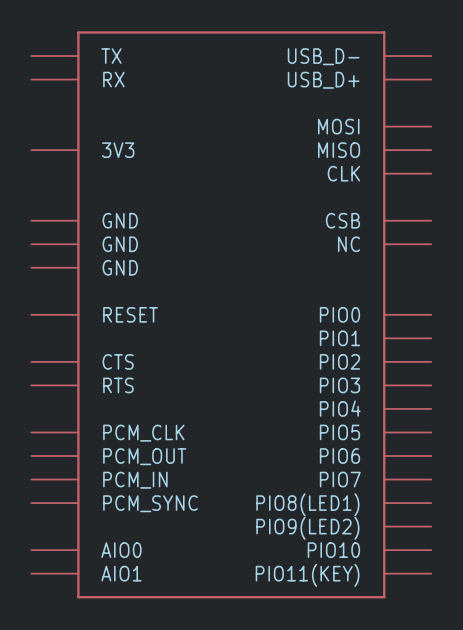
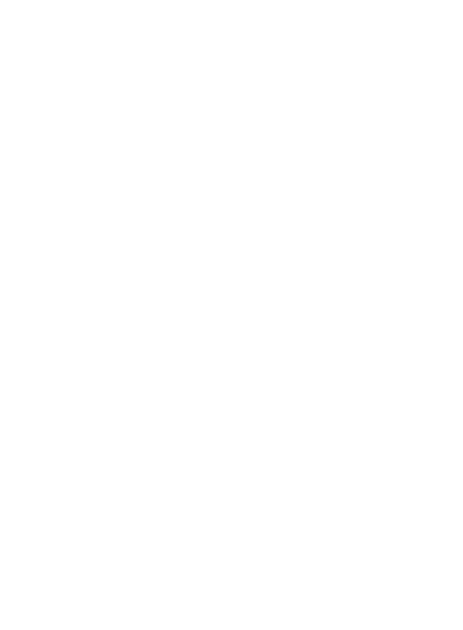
part: (231, 314) -> none

